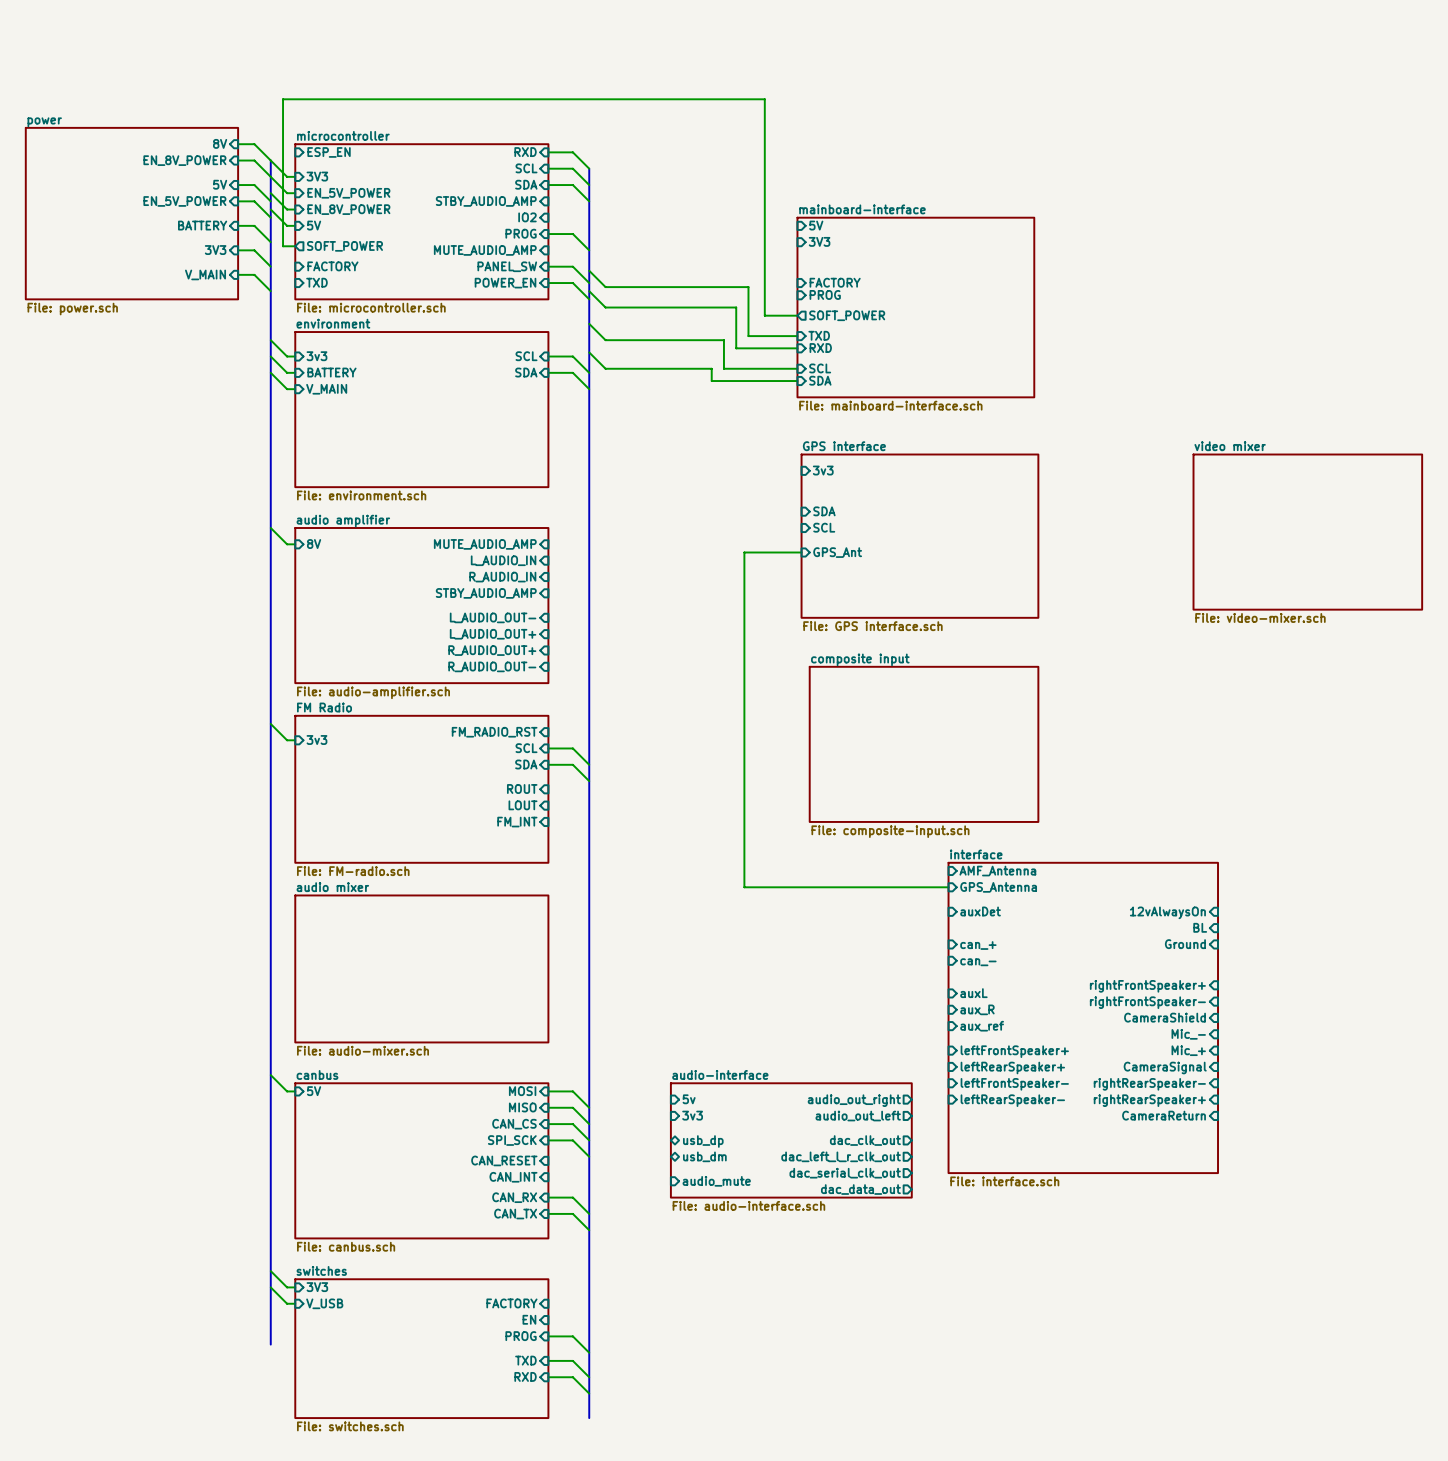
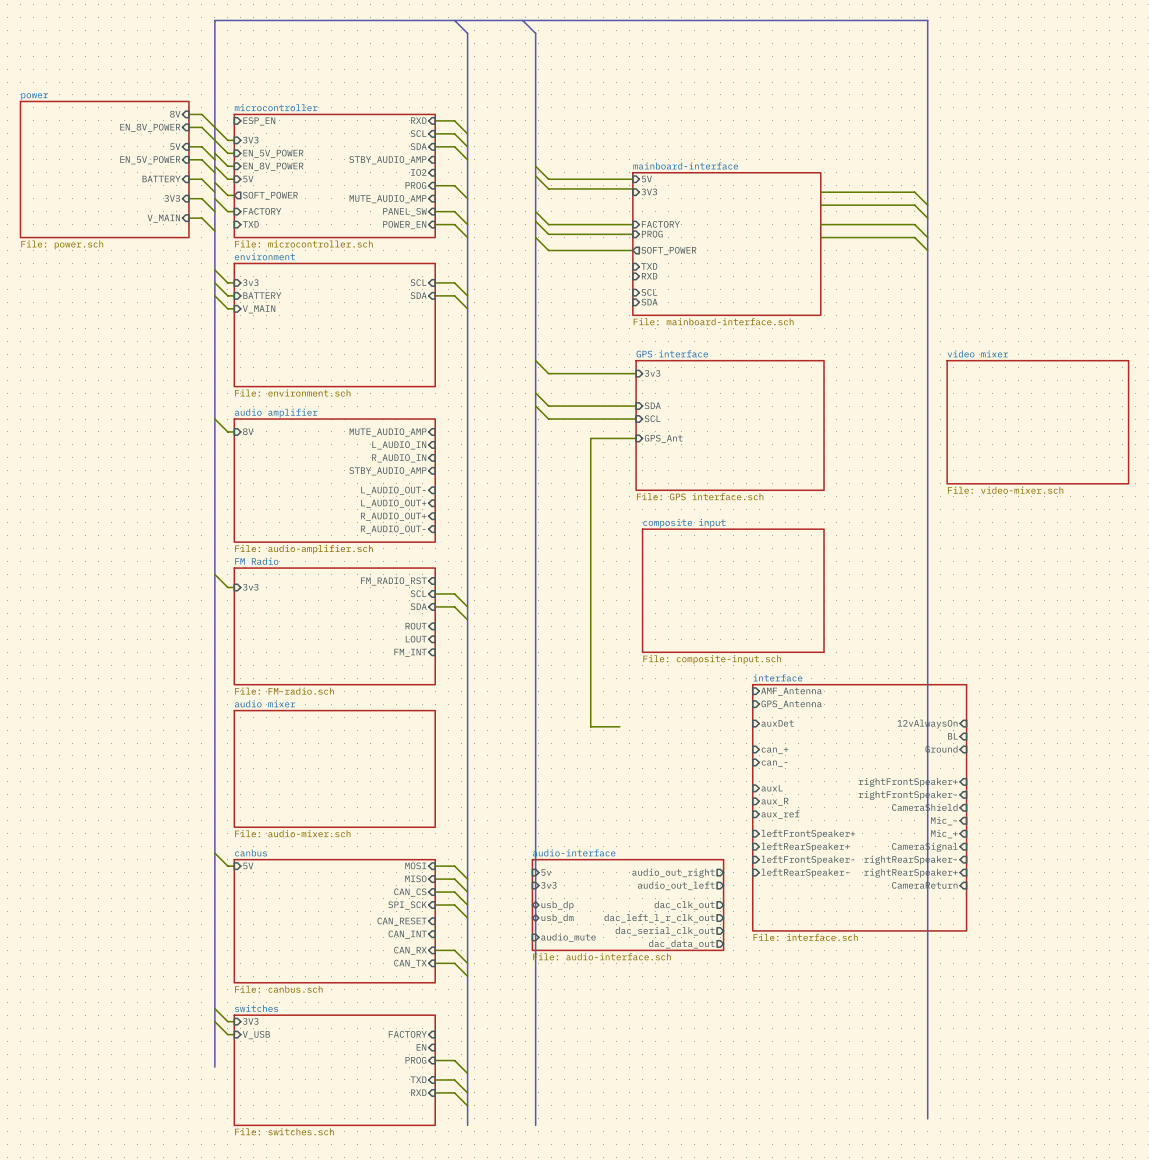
bus: none -> (454, 20) (467, 33) (467, 133)
bus: none -> (522, 20) (535, 33) (535, 1125)
bus: none -> (214, 127) (214, 20) (927, 20) (927, 1118)
wire: none -> (535, 166) (548, 179) (632, 179)
wire: none -> (535, 176) (548, 188) (632, 188)
wire: none -> (214, 182) (227, 195)
wire: none -> (820, 192) (914, 192) (927, 205)
wire: (287, 246) (283, 246) (283, 99) (764, 99) (764, 315) -> (535, 237) (548, 250) (606, 250)
wire: none -> (214, 198) (227, 211) (234, 211)
wire: none -> (820, 205) (914, 205) (927, 218)
wire: none -> (535, 211) (548, 224) (632, 224)
wire: (589, 270) (605, 287) (748, 287) (748, 336) (797, 336) -> none
wire: none -> (535, 221) (548, 234) (632, 234)
wire: none -> (820, 224) (914, 224) (927, 237)
wire: (589, 291) (605, 307) (736, 307) (736, 348) (797, 348) -> none
wire: none -> (820, 237) (914, 237) (927, 250)
wire: (589, 323) (605, 340) (723, 340) (723, 368) (797, 368) -> none
wire: (589, 352) (605, 368) (711, 368) (711, 381) (797, 381) -> none
wire: none -> (535, 360) (548, 373) (636, 373)
wire: none -> (535, 393) (548, 406) (636, 406)
wire: none -> (535, 406) (548, 419) (636, 419)
wire: (744, 887) (948, 887) -> (590, 704) (590, 726) (619, 726)

